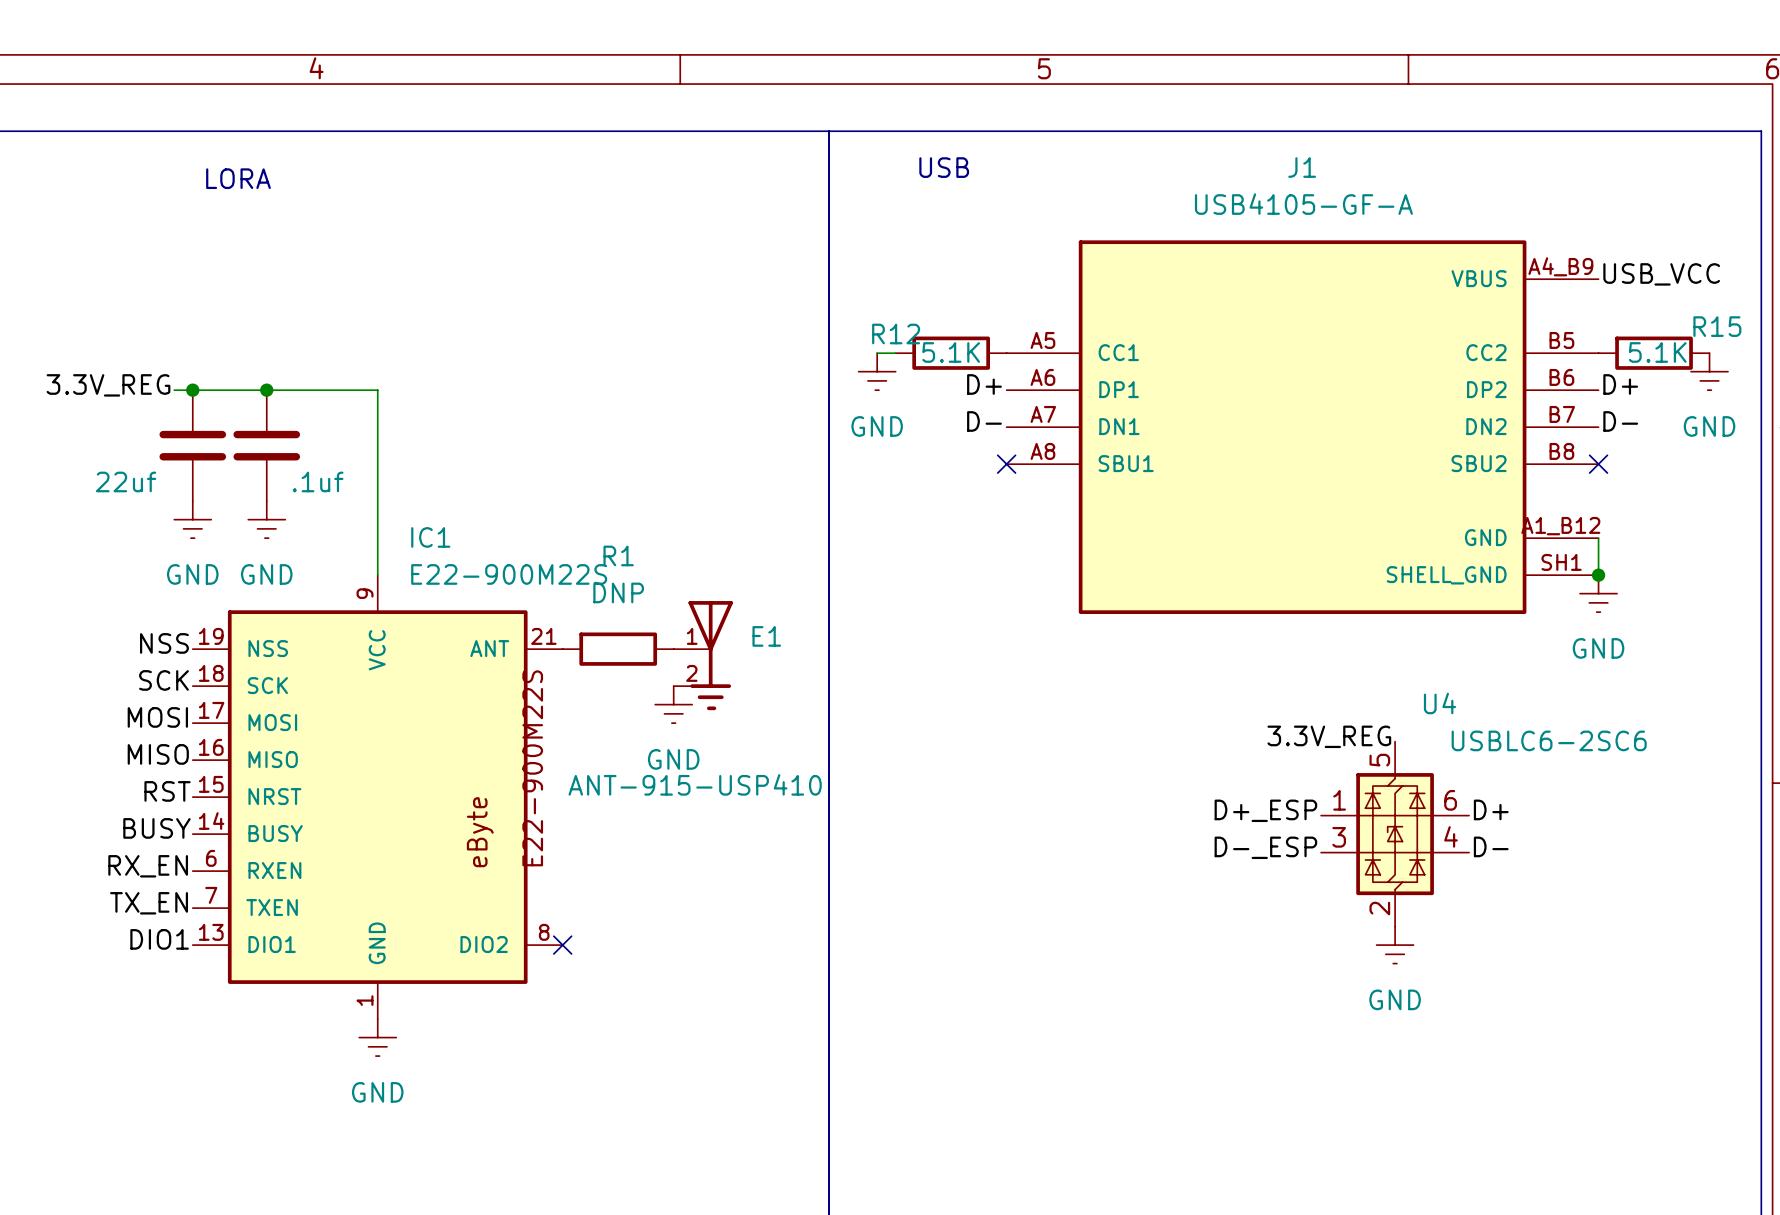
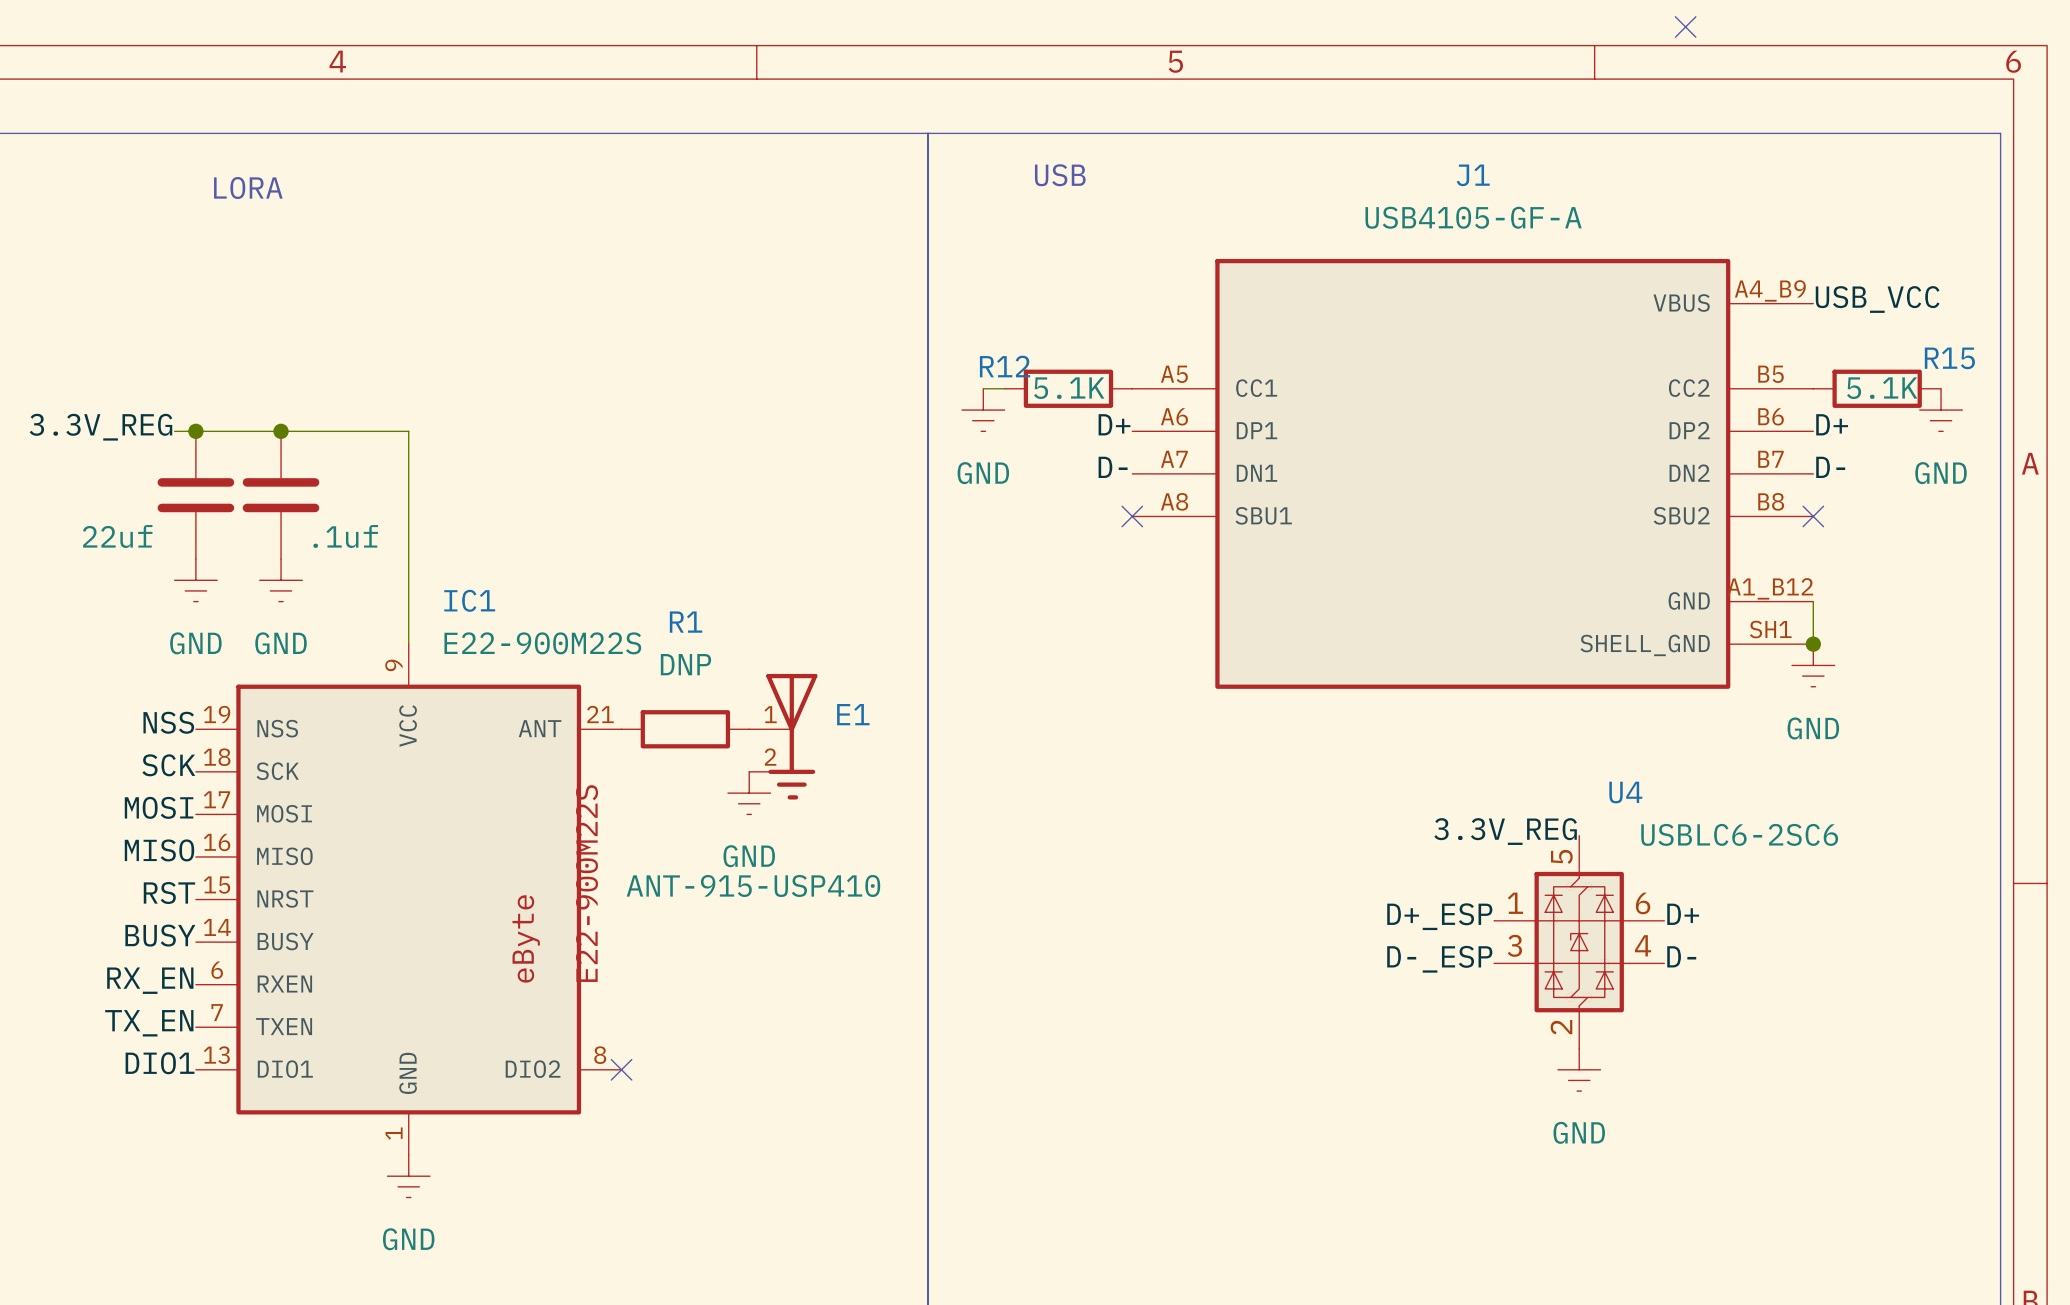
no-connect mark: none -> (1685, 26)

